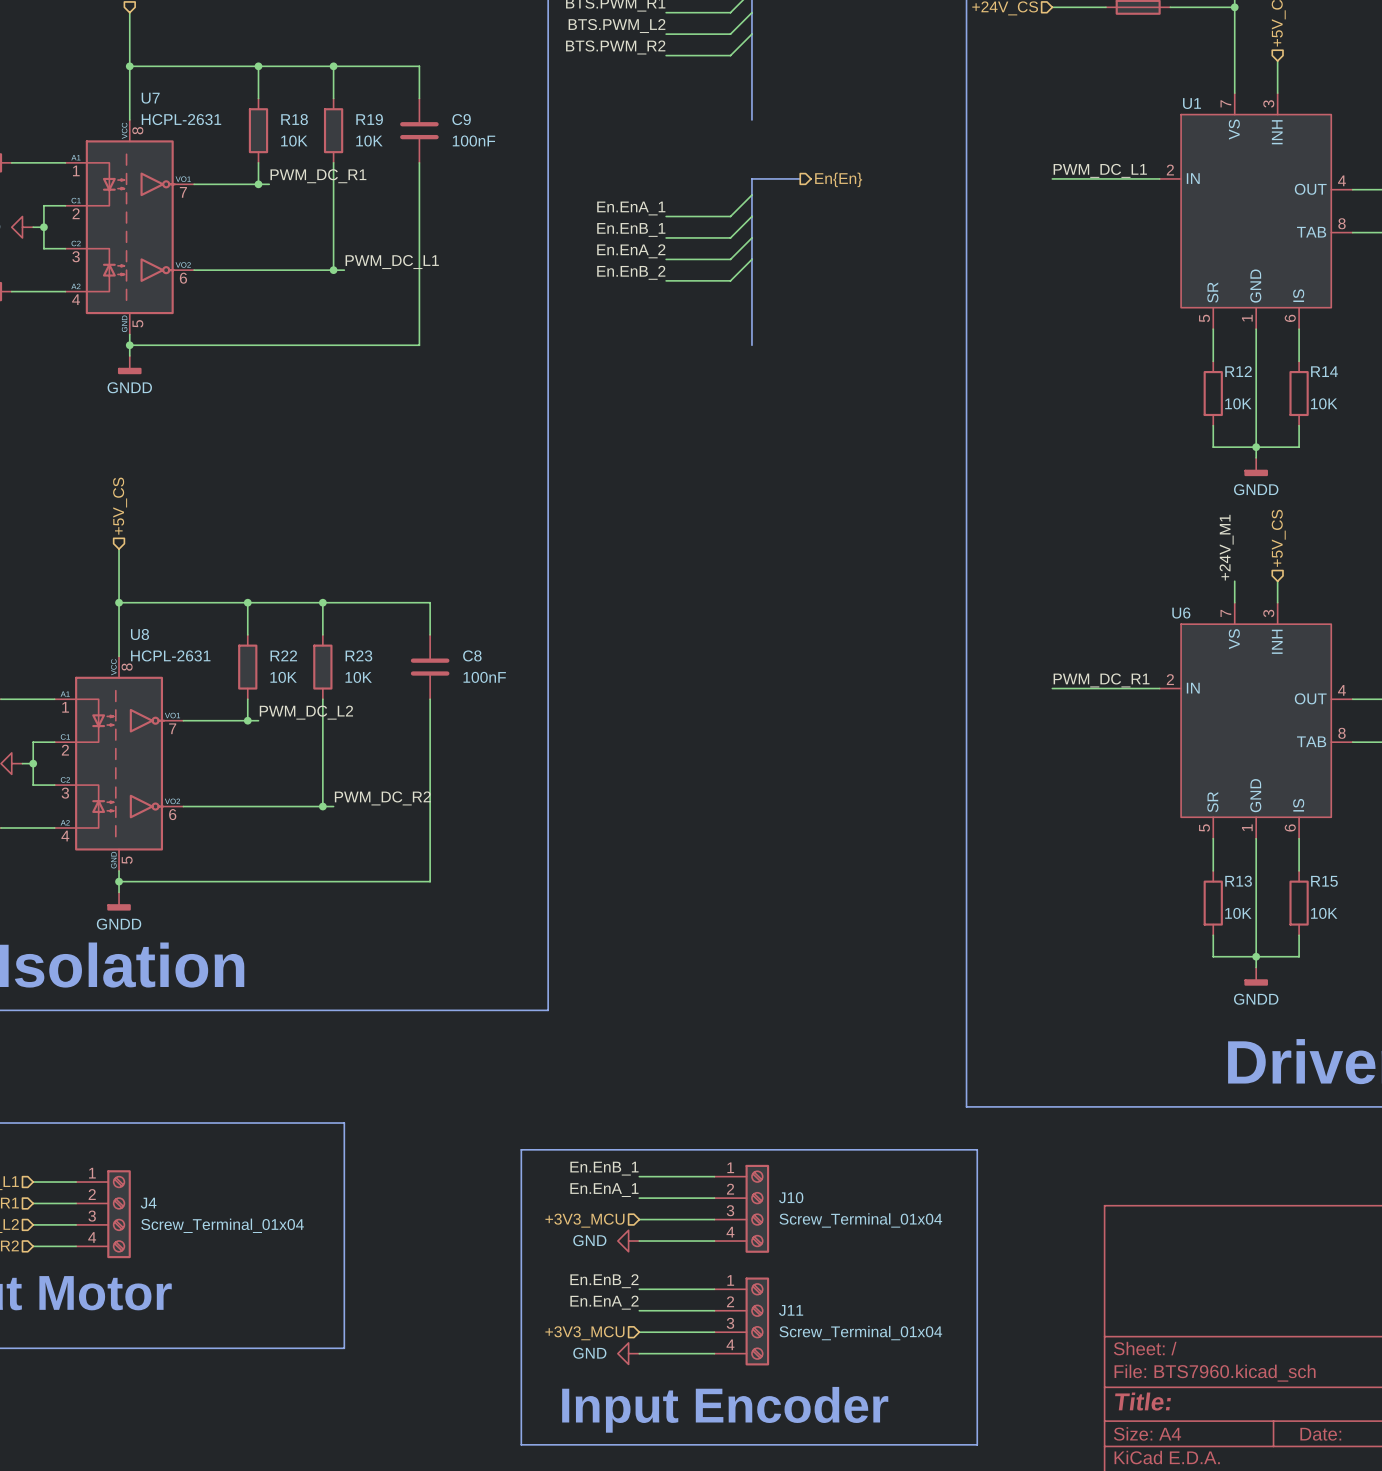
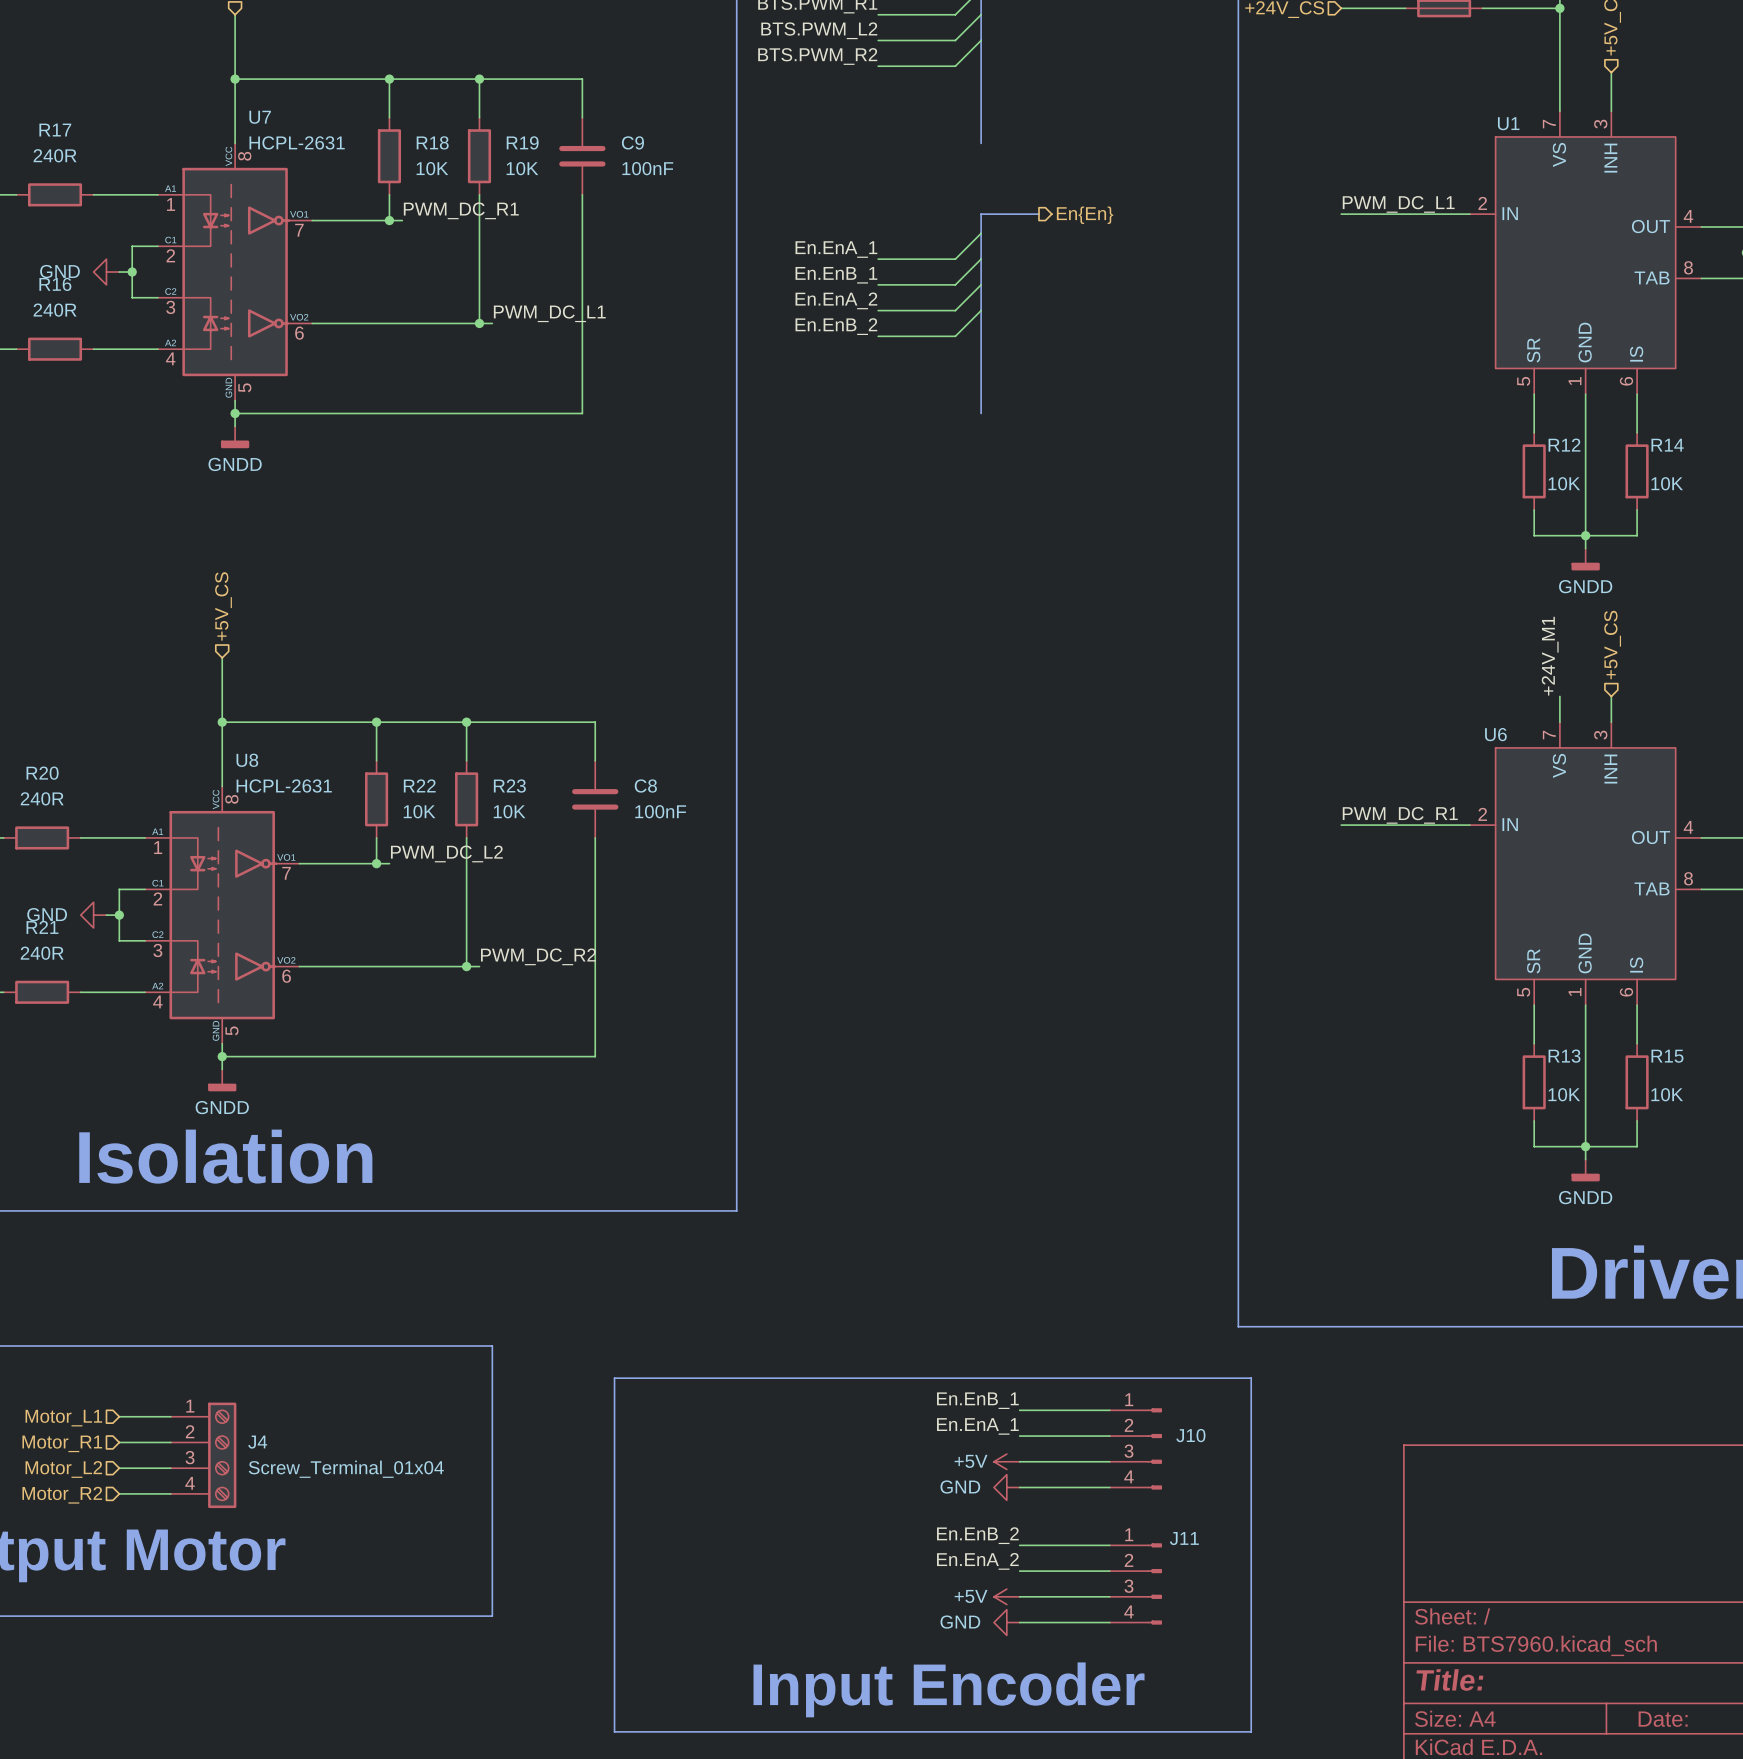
line: (521, 1149) (521, 1444) -> (704, 1378) (614, 1378) (614, 1731) (704, 1731)
J10 symbol: [714, 1164, 770, 1253] -> [1109, 1408, 1162, 1490]
label position: En.EnB_1 (604, 1168) -> En.EnB_1 (977, 1400)
wire: (639, 1176) (714, 1176) -> (1019, 1410) (1109, 1410)
label position: En.EnA_1 (604, 1190) -> En.EnA_1 (977, 1426)
wire: (639, 1198) (714, 1198) -> (1019, 1436) (1109, 1436)
wire: (639, 1219) (714, 1219) -> (1019, 1461) (1109, 1461)
power symbol: none -> +5V (1006, 1461)
hierarchical label: +3V3_MCU (584, 1220) -> none
J10 value: Screw_Terminal_01x04 (860, 1220) -> none
power symbol: GND (628, 1241) -> none
wire: (639, 1241) (714, 1241) -> (1019, 1487) (1109, 1487)
power symbol: none -> GND (1006, 1487)
J11 symbol: [714, 1277, 770, 1366] -> [1109, 1543, 1162, 1625]
label position: En.EnB_2 (604, 1281) -> En.EnB_2 (977, 1535)
wire: (639, 1289) (714, 1289) -> (1019, 1545) (1109, 1545)
label position: En.EnA_2 (604, 1302) -> En.EnA_2 (977, 1561)
wire: (639, 1310) (714, 1310) -> (1019, 1571) (1109, 1571)
J11 name position: J11 (791, 1310) -> J11 (1184, 1538)
wire: (639, 1332) (714, 1332) -> (1019, 1596) (1109, 1596)
power symbol: none -> +5V (1006, 1596)
hierarchical label: +3V3_MCU (584, 1333) -> none
J11 value: Screw_Terminal_01x04 (860, 1333) -> none
power symbol: GND (628, 1353) -> none
wire: (639, 1353) (714, 1353) -> (1019, 1622) (1109, 1622)
power symbol: none -> GND (1006, 1622)

